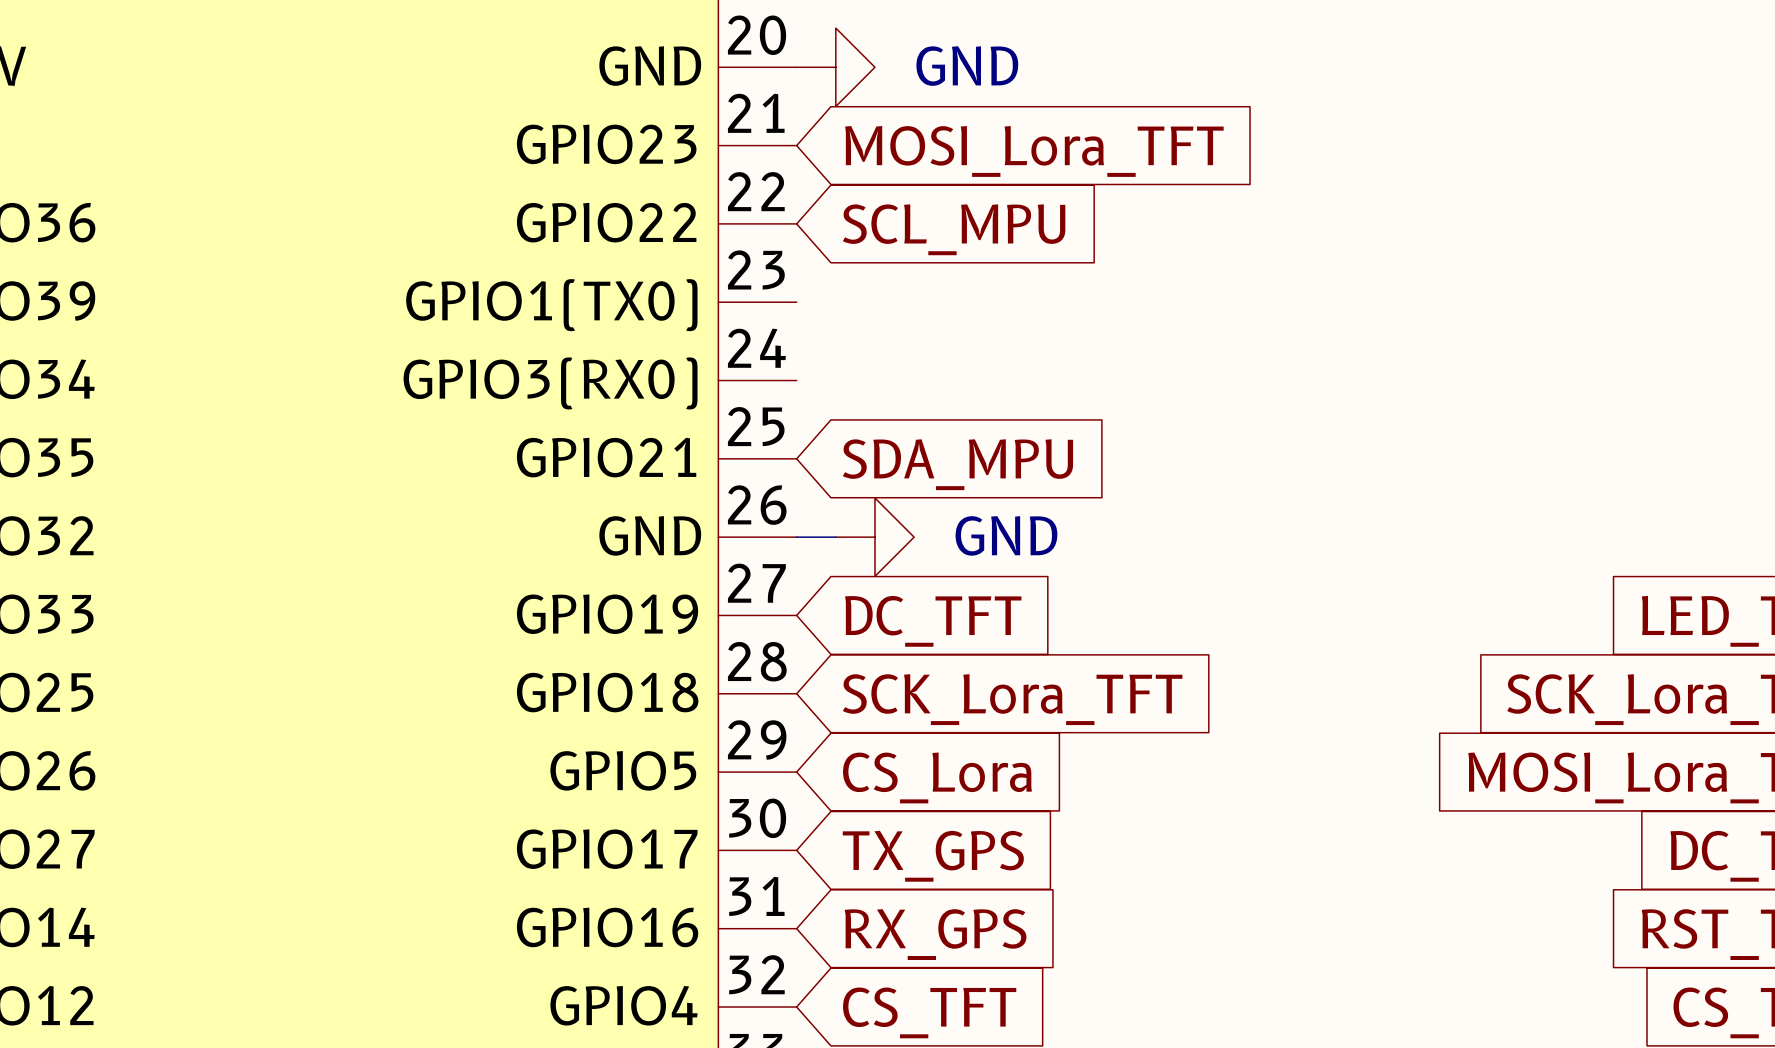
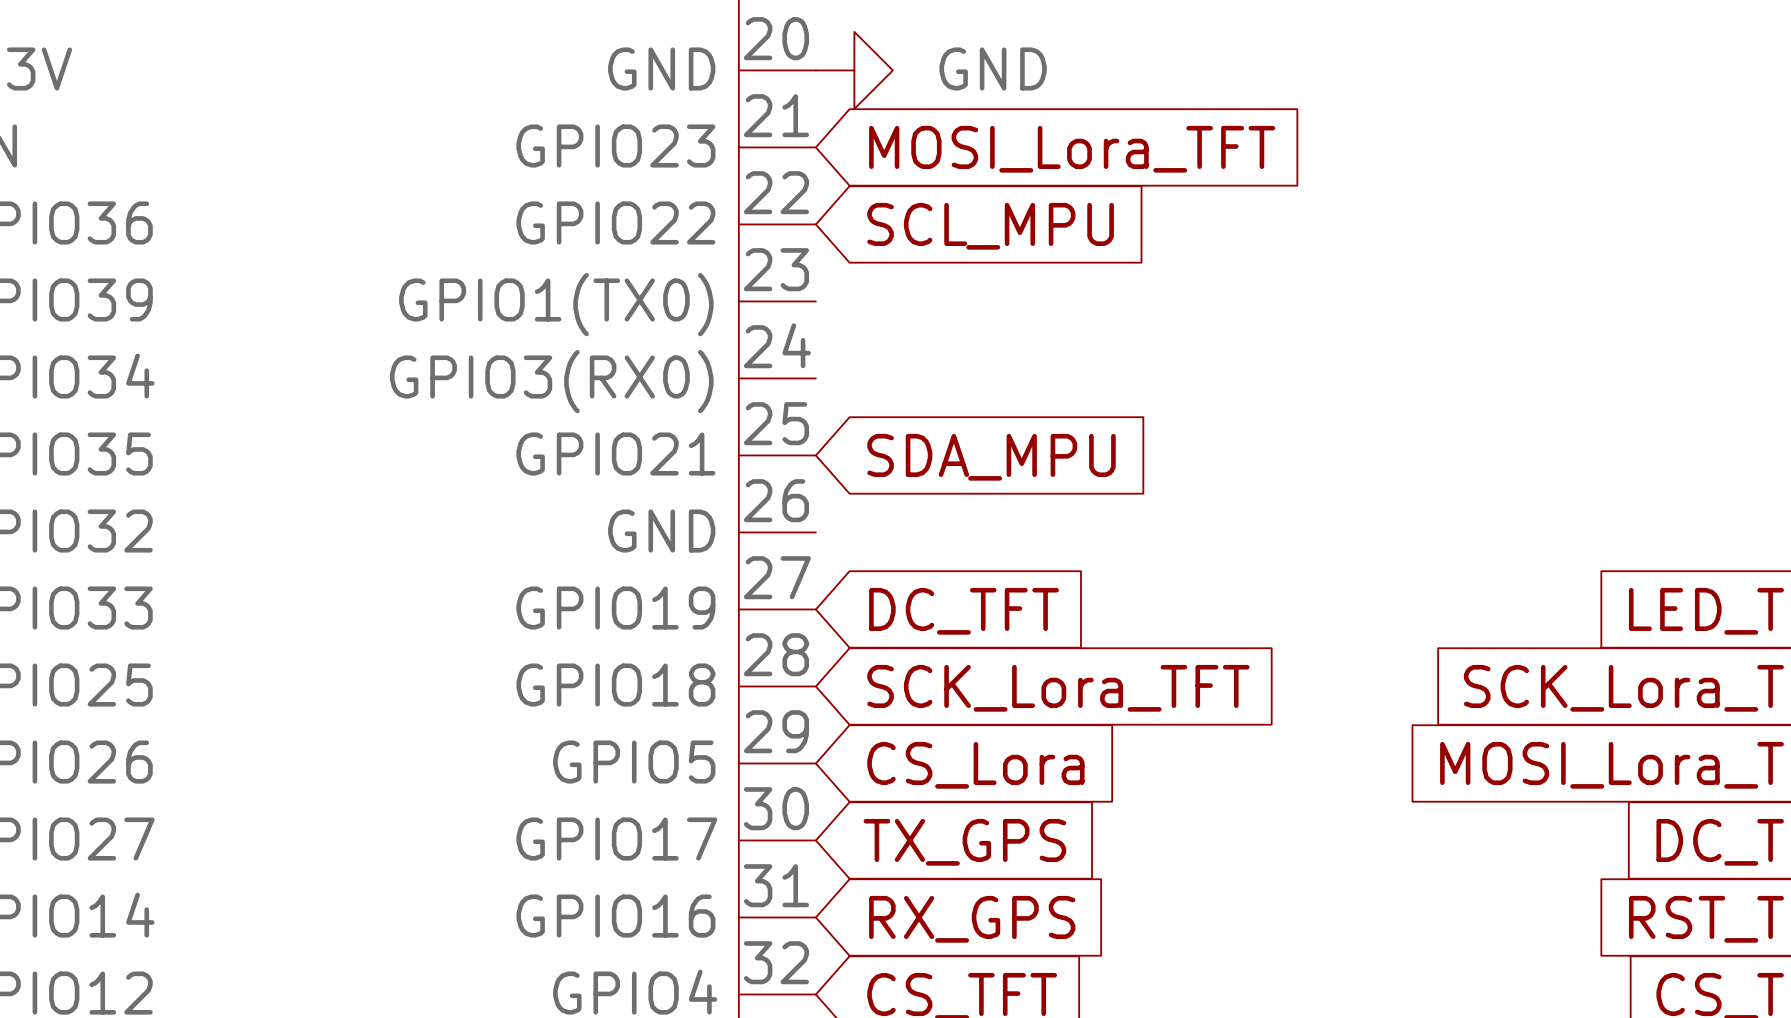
wire: (796, 537) (835, 537) -> none
power symbol: GND (874, 537) -> none

